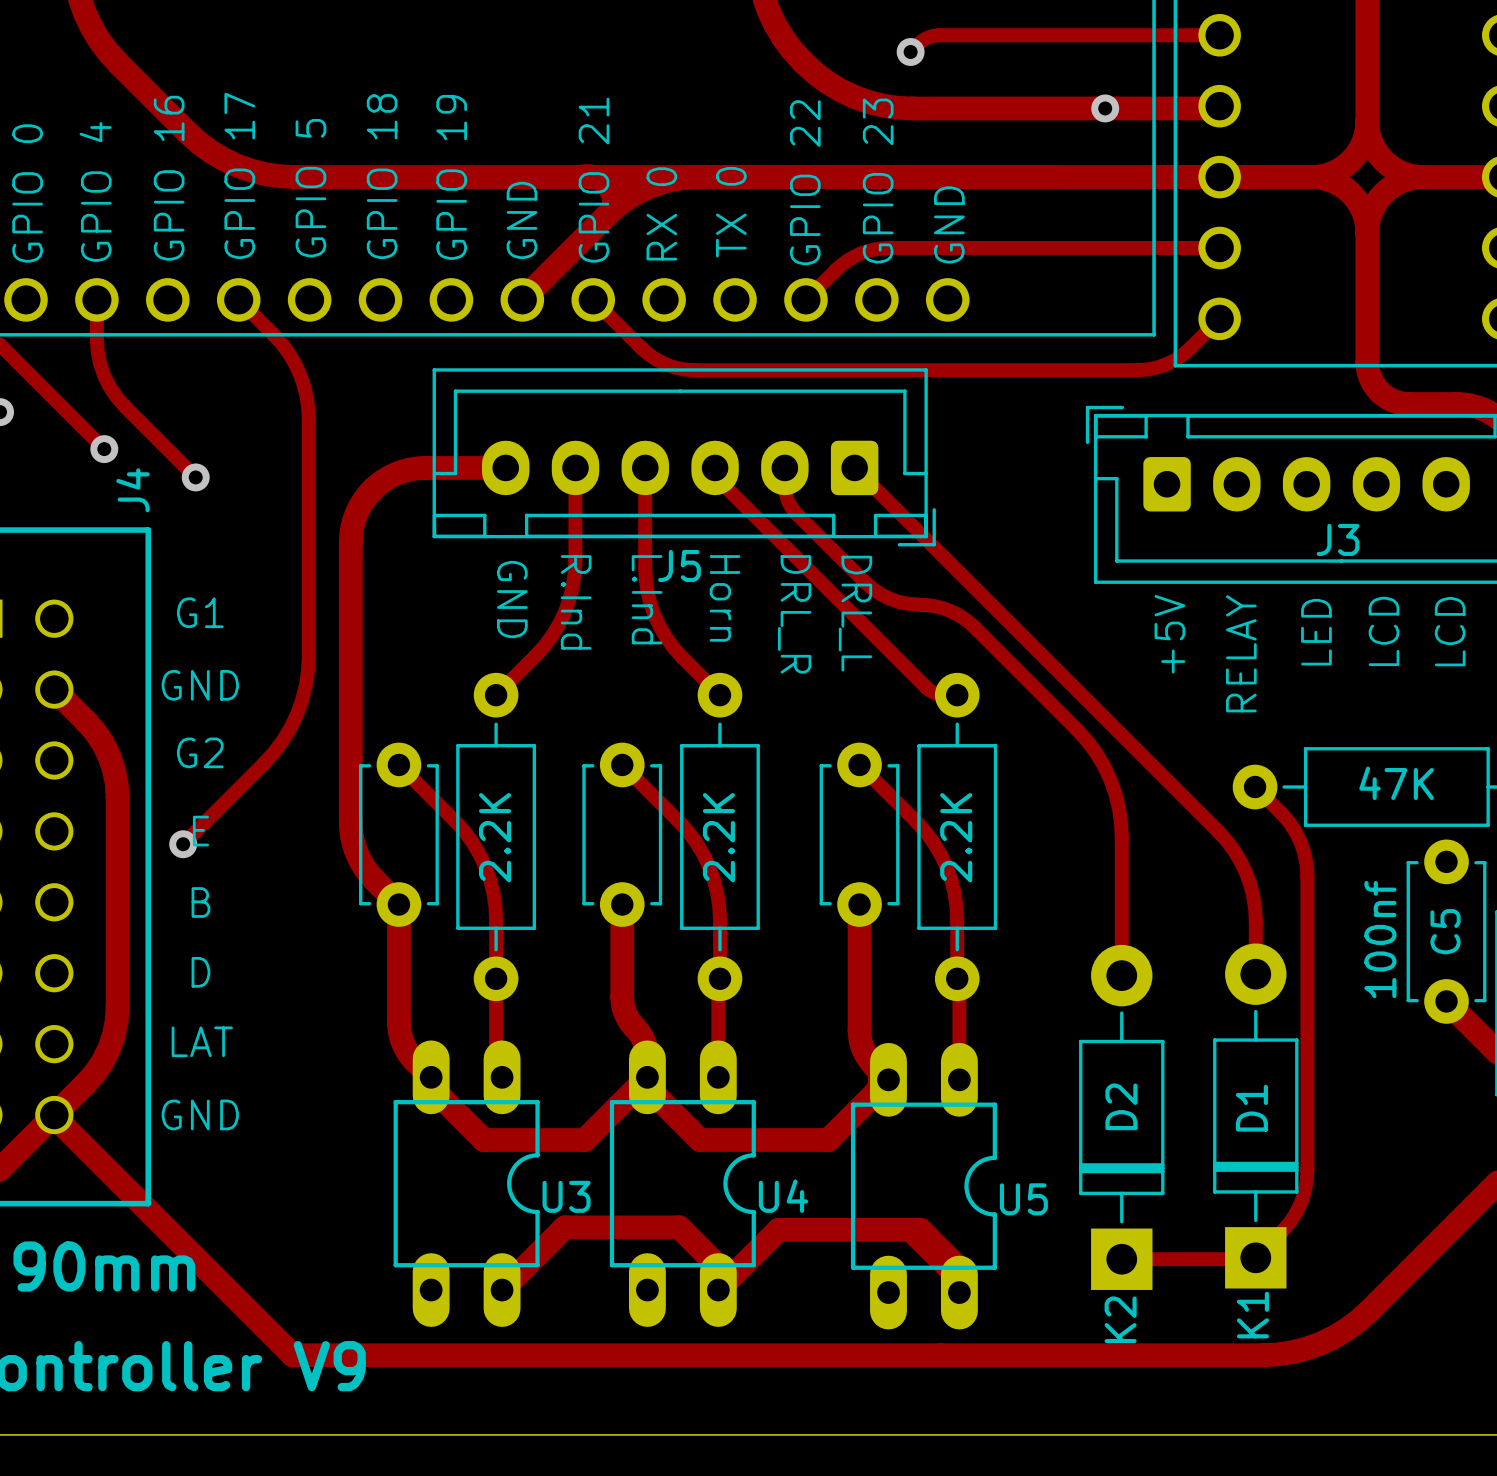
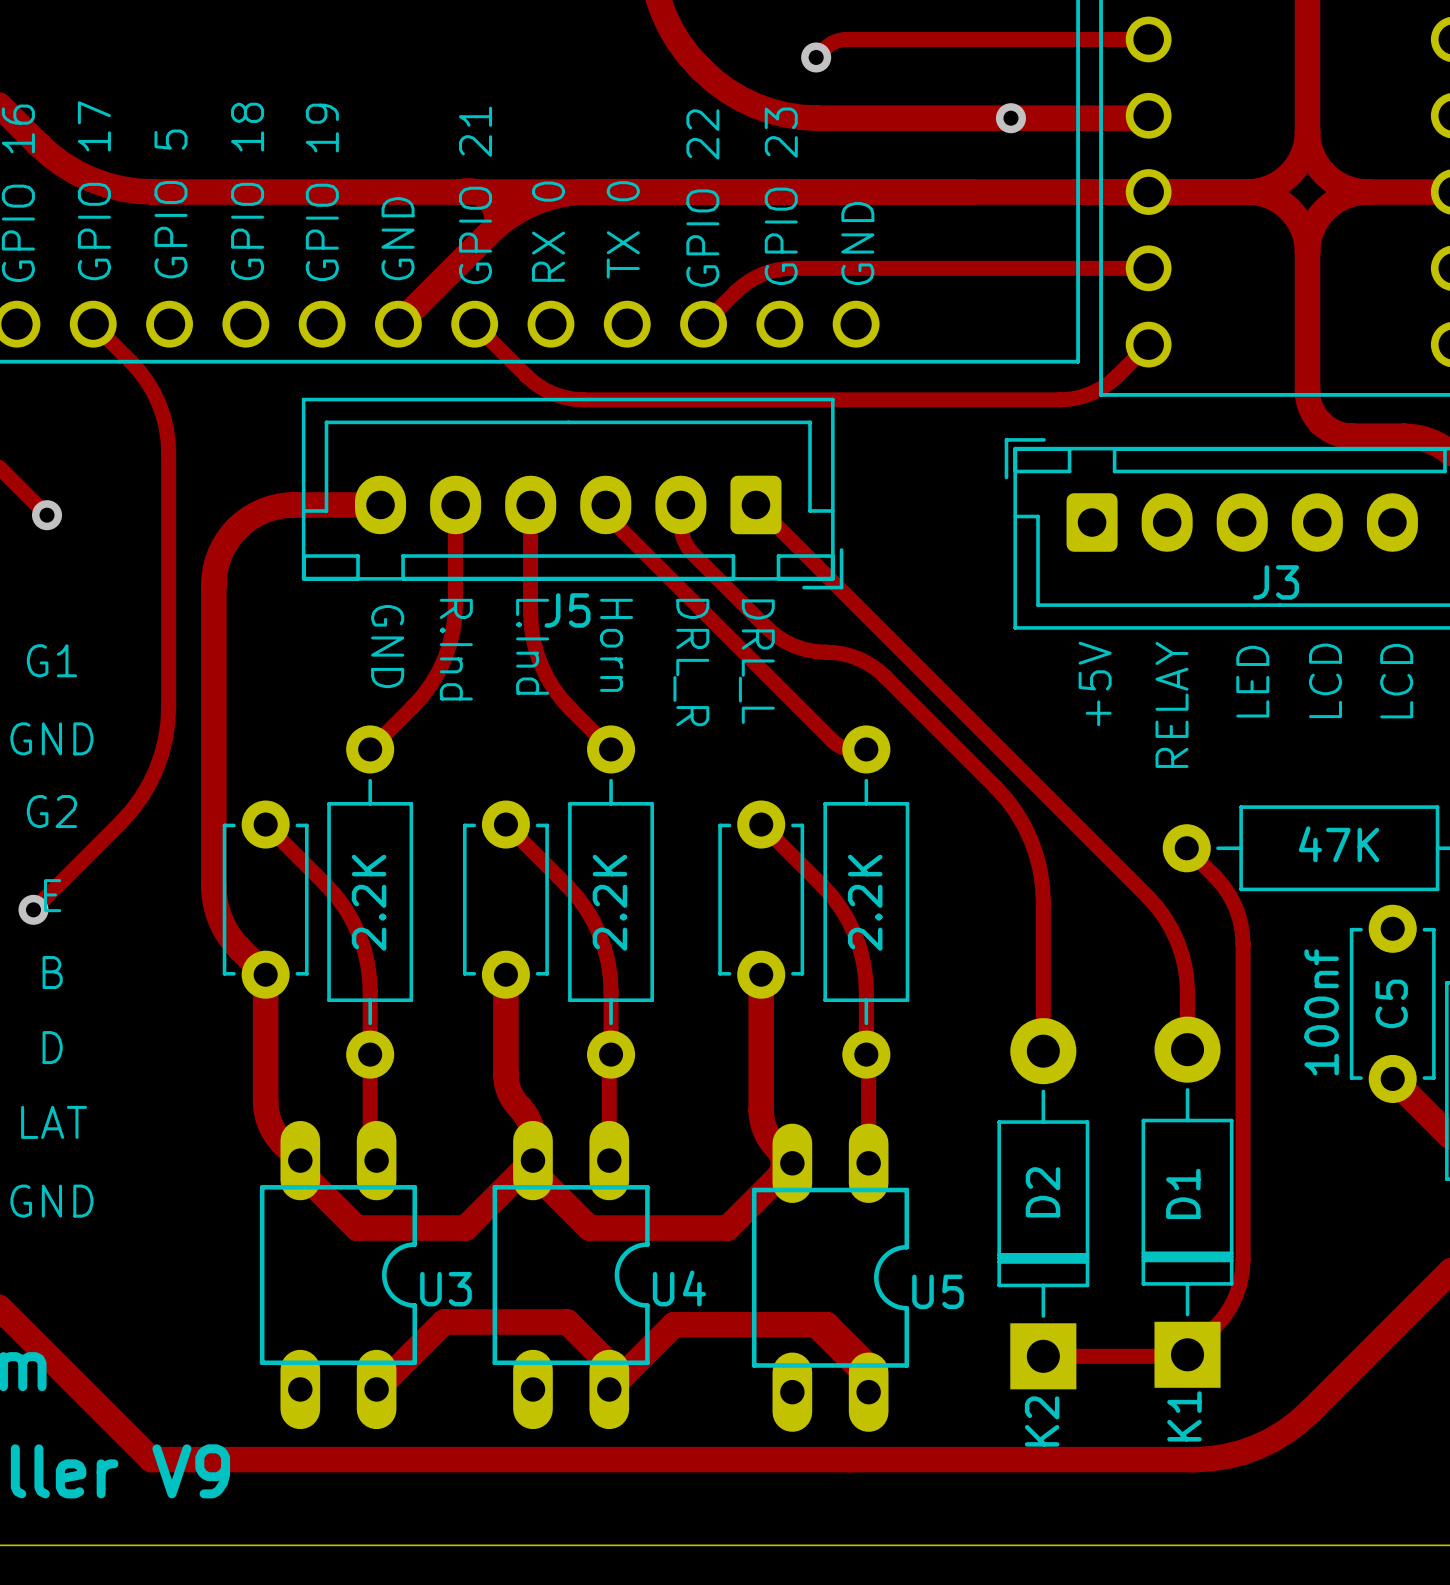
via position: (1105, 108) -> (1010, 118)

